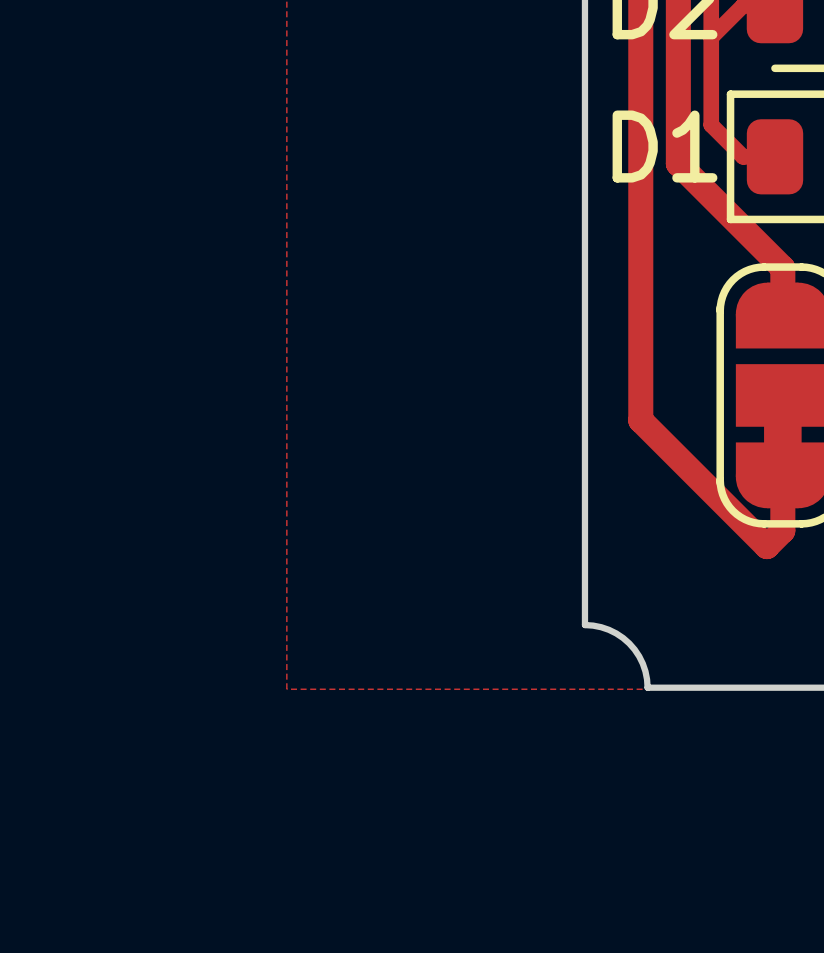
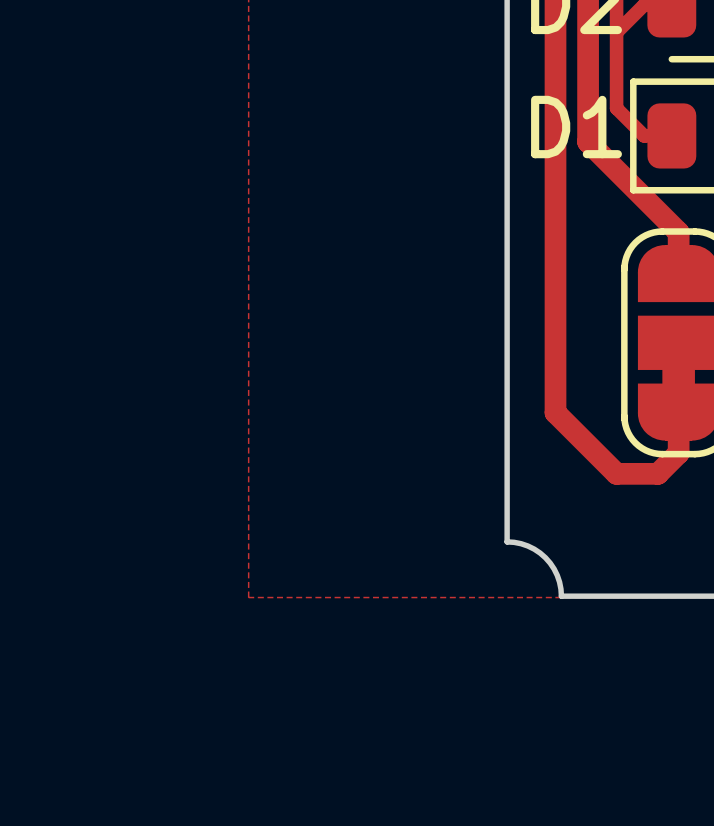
track: (640, 420) (766, 546) (782, 530) (782, 522) -> (555, 364) (555, 412) (616, 473) (657, 473) (678, 453)

